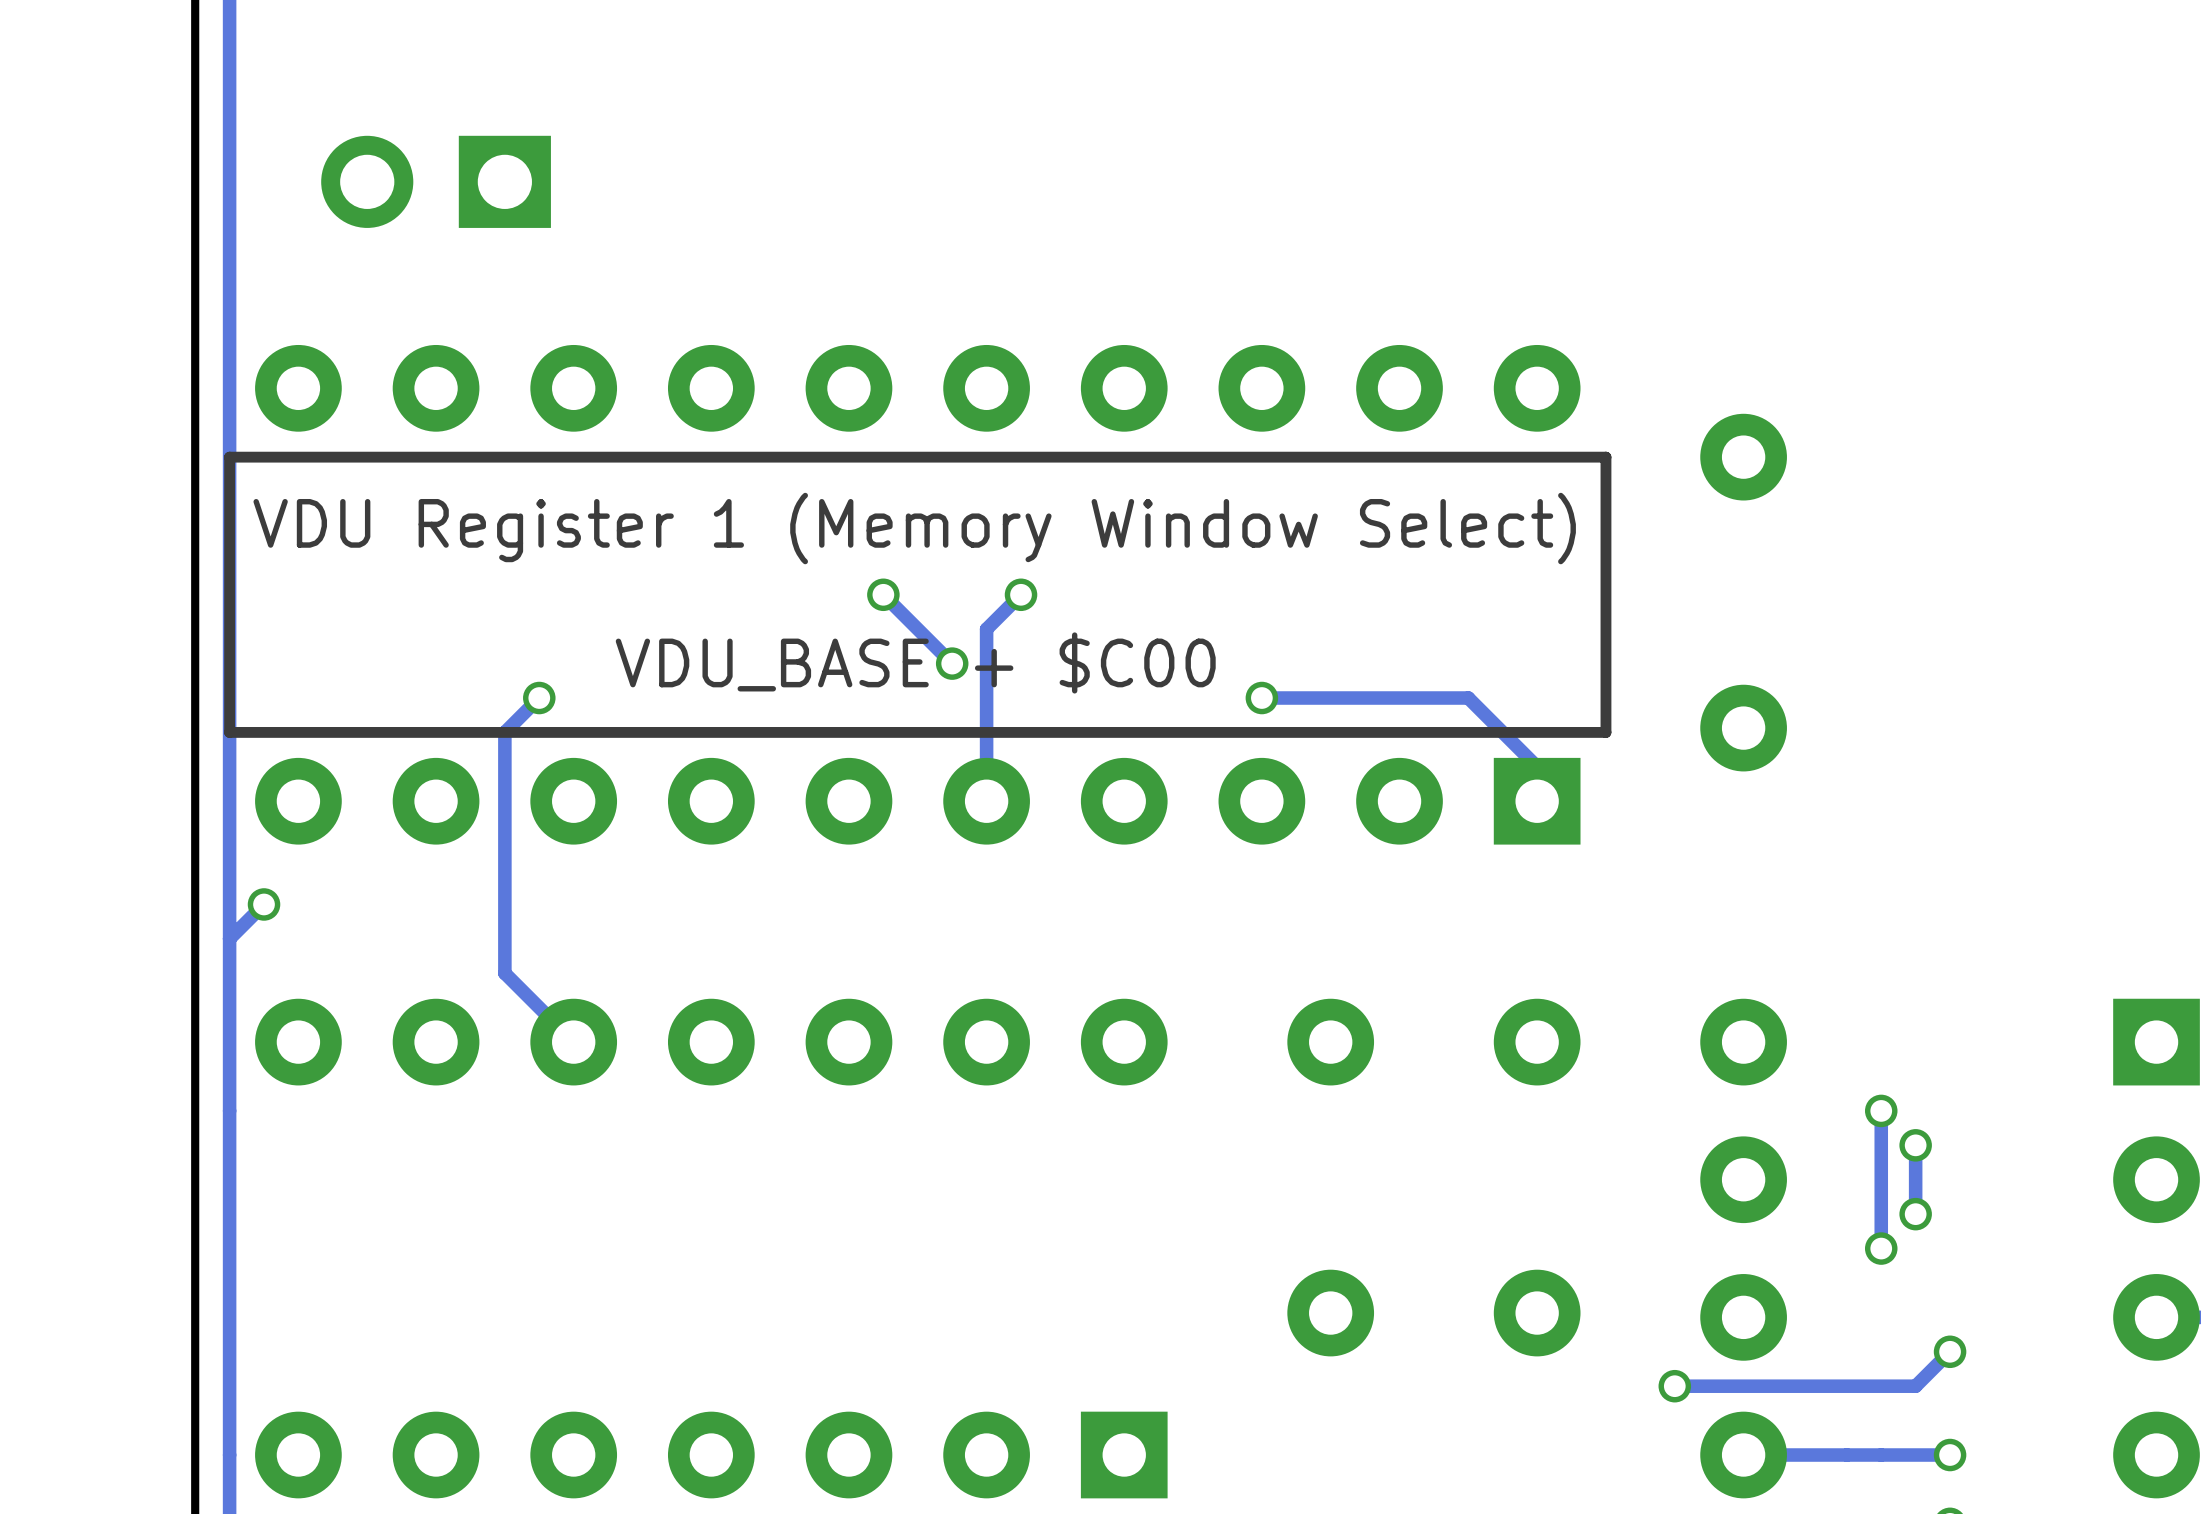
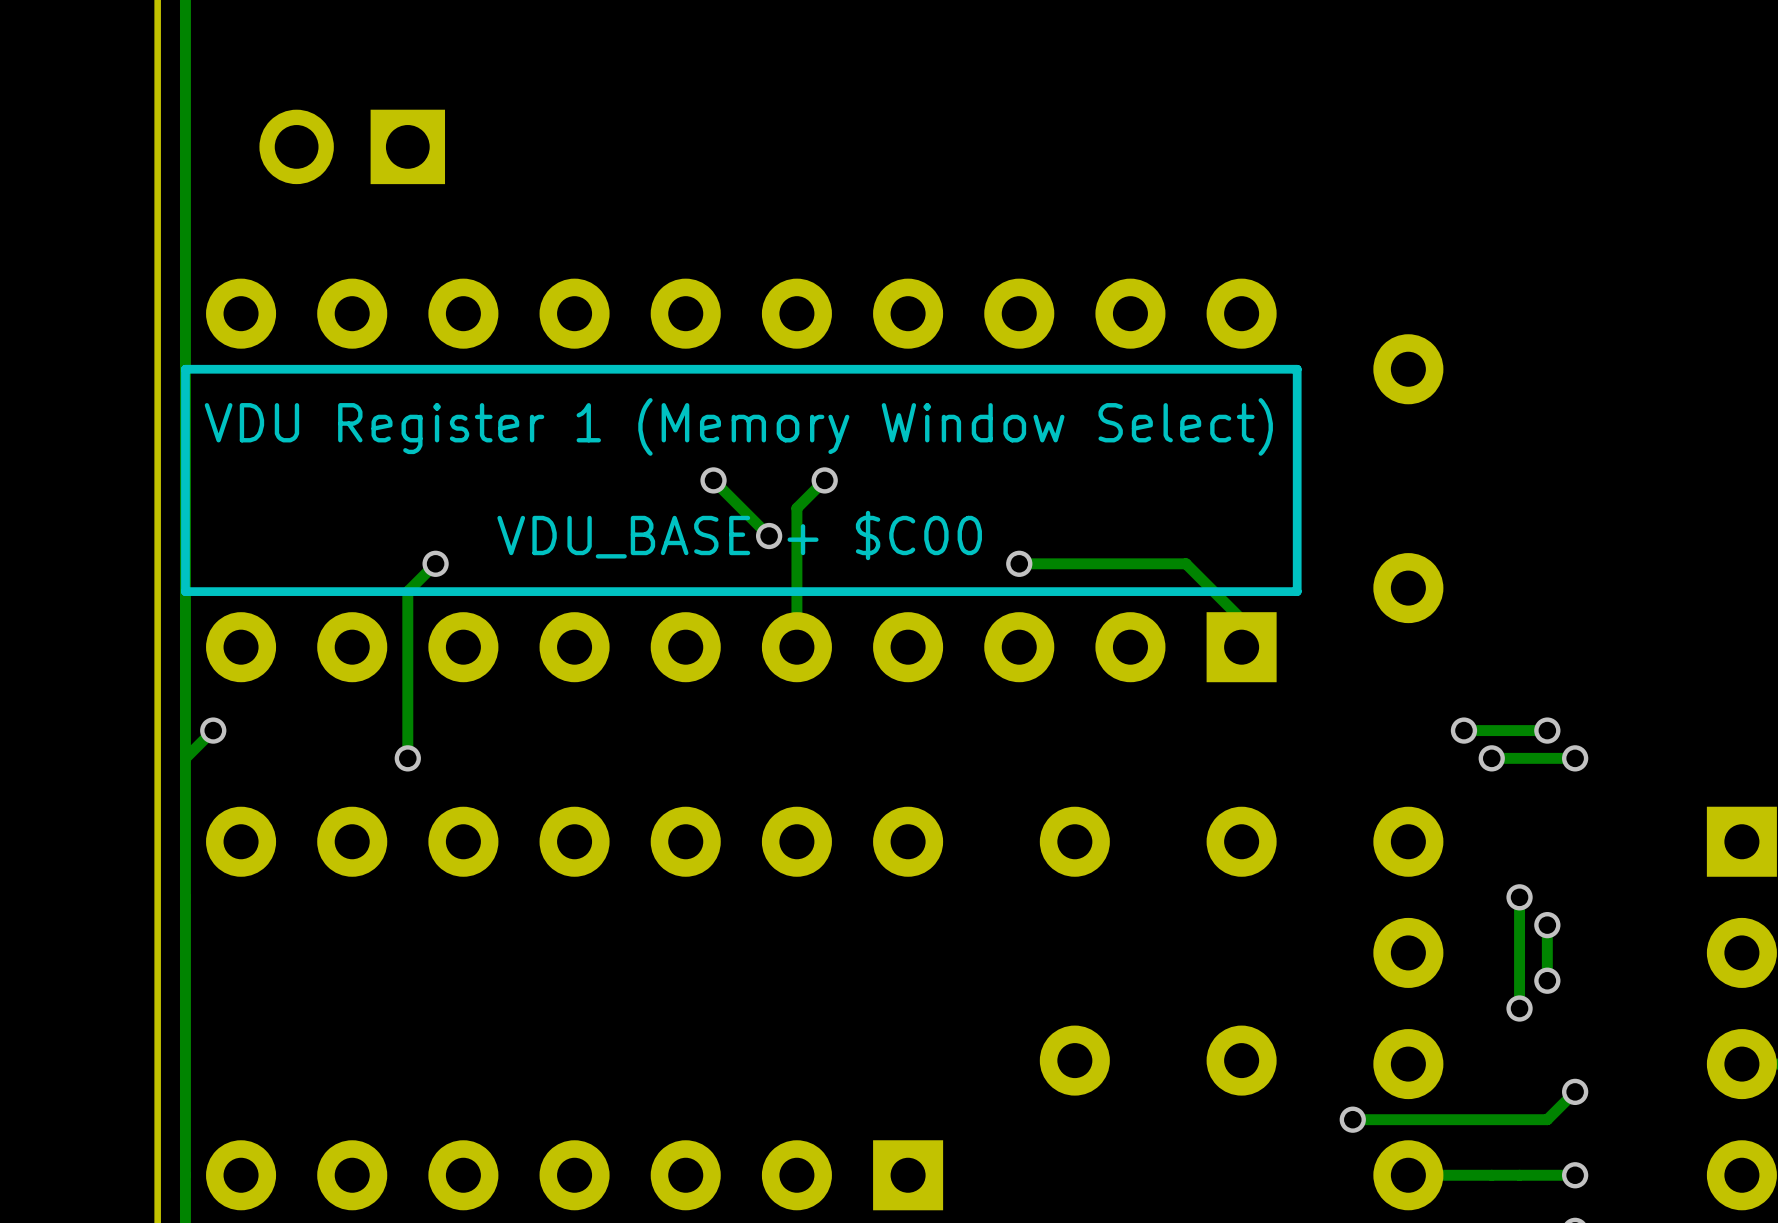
via: none -> (1463, 730)
track: none -> (1547, 730) (1463, 730)
via: none -> (1547, 730)
track: (504, 938) (504, 973) (573, 1042) -> none
via: none -> (407, 758)
via: none -> (1491, 758)
track: none -> (1575, 758) (1491, 758)
via: none -> (1575, 758)

